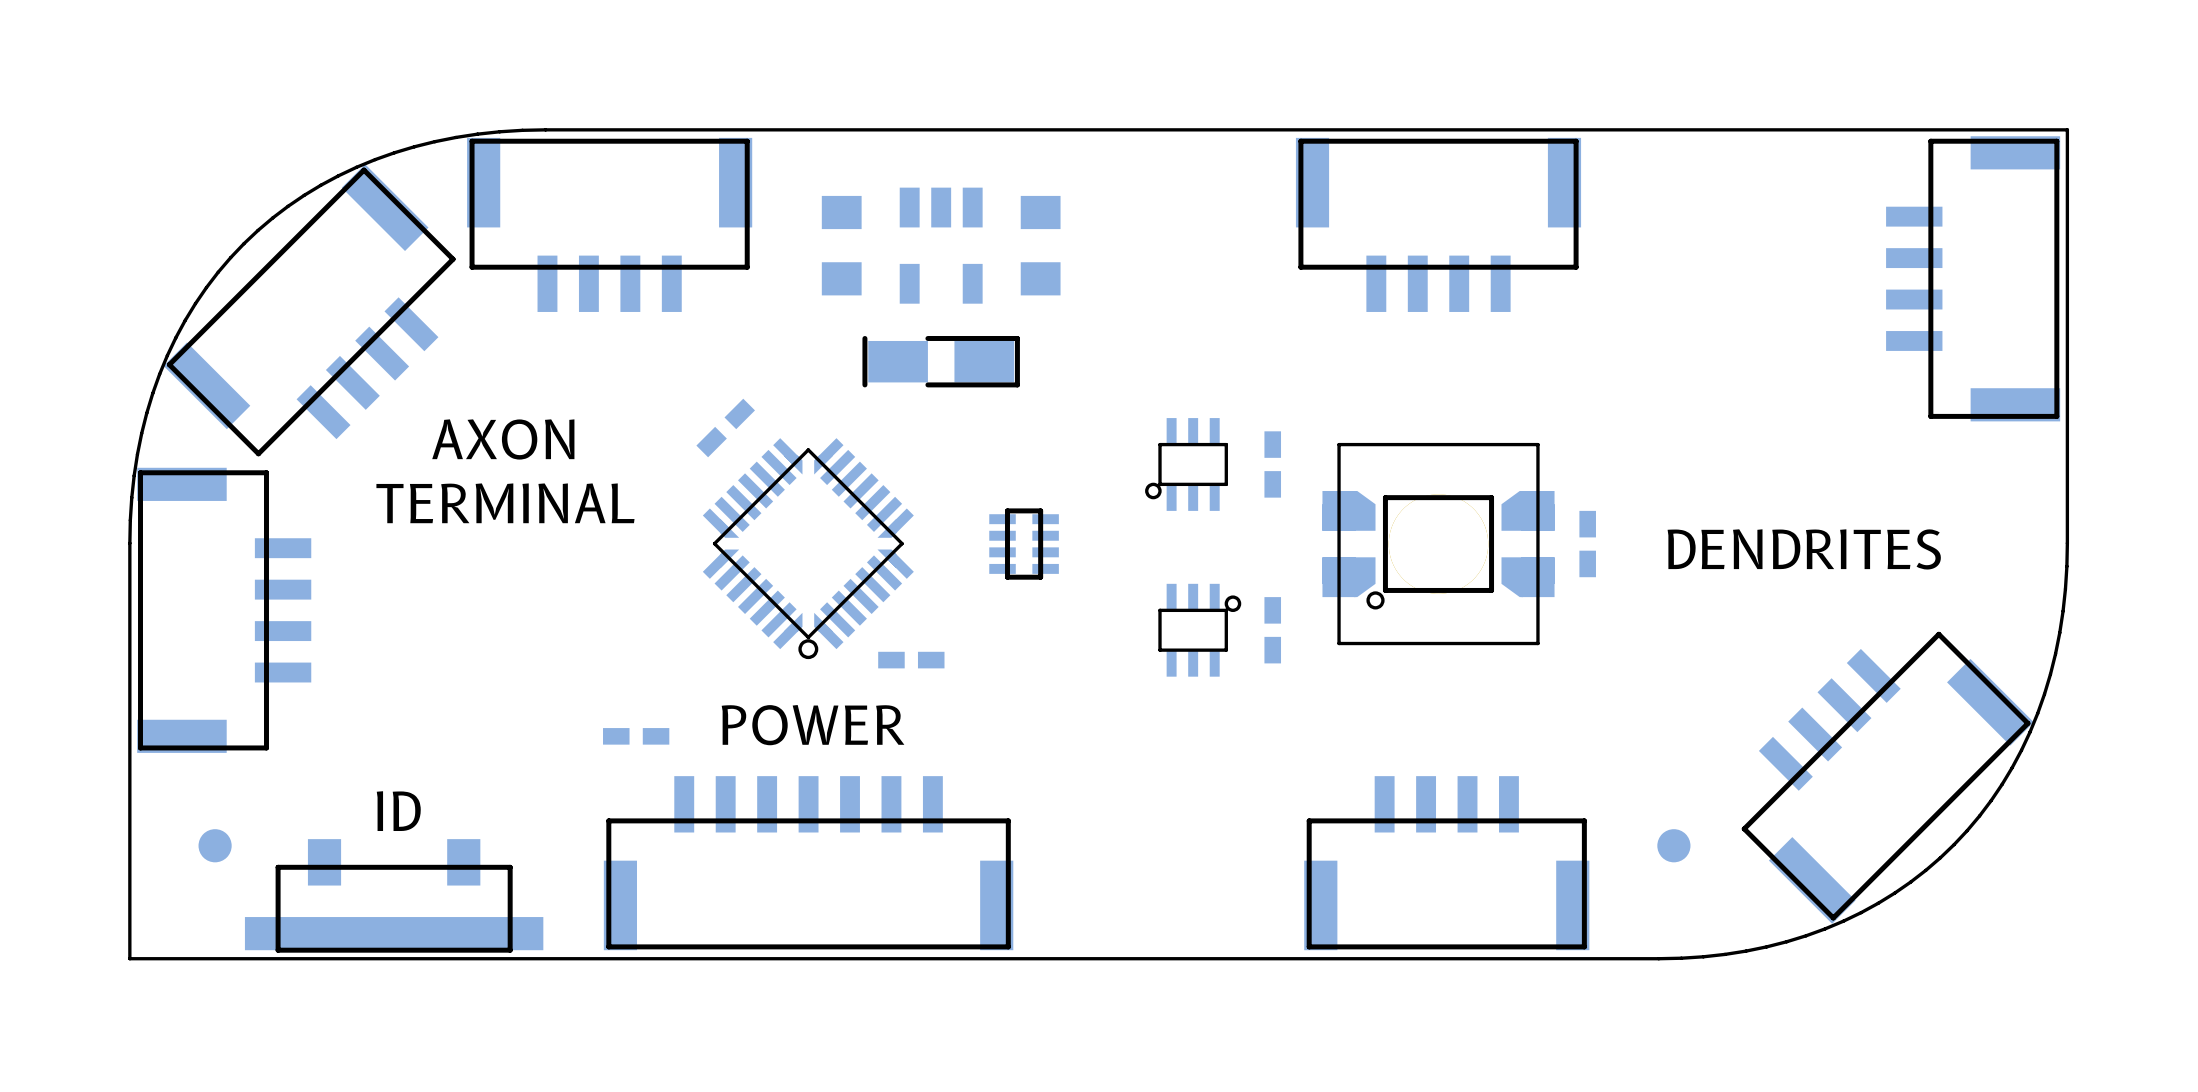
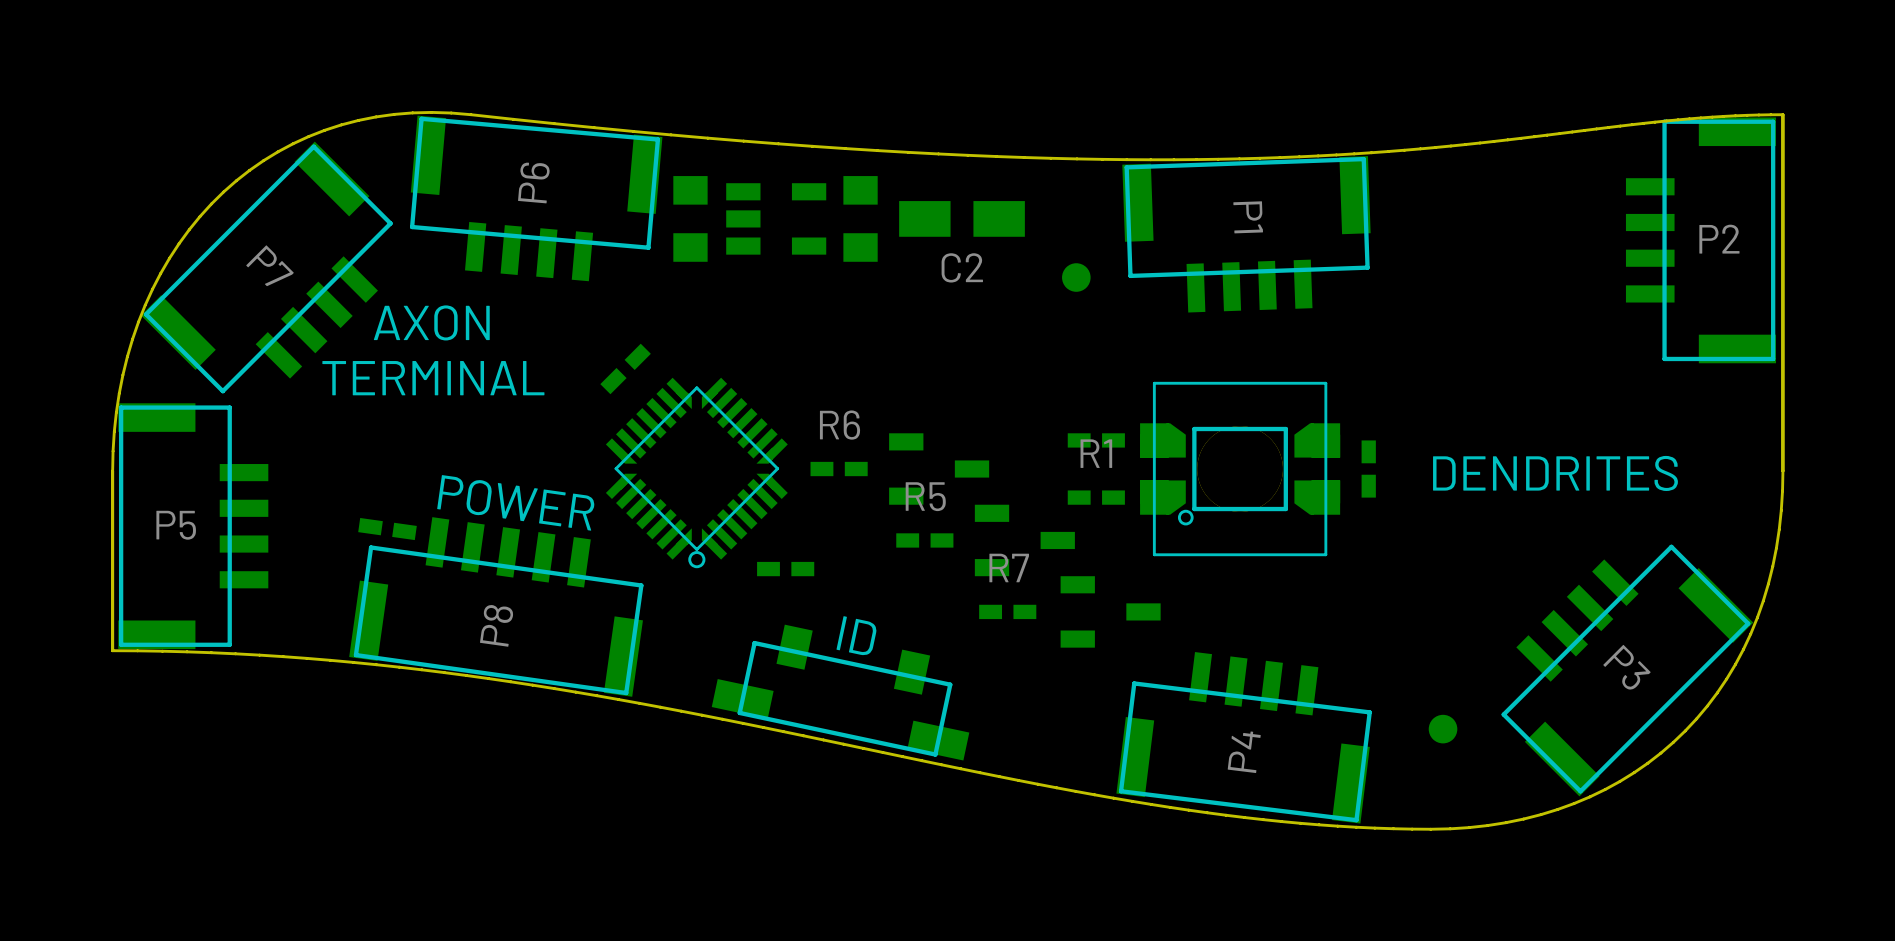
board edge: (2067, 129) (522, 130) (477, 134) (434, 141) (394, 152) (356, 167) (320, 185) (288, 206) (257, 230) (218, 272) (195, 303) (175, 337) (159, 374) (146, 413) (134, 475) (130, 520) (129, 958) (1681, 958) (1725, 954) (1766, 946) (1806, 935) (1843, 921) (1878, 903) (1910, 882) (1954, 844) (1979, 815) (2002, 784) (2021, 750) (2037, 713) (2050, 674) (2063, 611) (2066, 566) (2067, 129) -> (431, 112) (707, 138) (845, 148) (996, 156) (1150, 159) (1259, 158) (1371, 152) (1480, 143) (1677, 119) (1782, 114) (1782, 491) (1776, 548) (1768, 584) (1757, 617) (1735, 664) (1707, 706) (1673, 742) (1634, 772) (1589, 796) (1540, 814) (1487, 825) (1430, 829) (1300, 823) (1151, 804) (1018, 780) (660, 707) (466, 675) (376, 664) (283, 656) (112, 650) (112, 471) (116, 412) (122, 374) (132, 339) (145, 305) (169, 258) (200, 216) (223, 191) (249, 170) (277, 151) (324, 130) (358, 120) (394, 114) (431, 112)
part: (609, 224) -> none
part: (1438, 224) -> none
P6: none -> (536, 198)
part position: (841, 245) -> (690, 218)
part rotation: 0° (941, 245) -> 90° counterclockwise (776, 218)
part position: (1040, 245) -> (860, 218)
C2: none -> (962, 218)
P1: none -> (1246, 234)
P2 name: none -> P2 (1719, 239)
P7 name: none -> P7 (270, 265)
part: none -> (1076, 277)
part: (941, 361) -> none
text: none -> AXON (431, 322)
text: AXON (503, 439) -> TERMINAL (433, 378)
part: (1186, 464) -> none
part rotation: 0° (1272, 464) -> 90° clockwise (1096, 440)
part position: (1272, 464) -> (1096, 440)
text: TERMINAL (505, 503) -> none
R6: none -> (839, 469)
part: (1024, 544) -> none
part: none -> (939, 469)
R1: none -> (1096, 497)
part footprint: [1158, 583, 1242, 677] -> [974, 504, 1075, 577]
P5 name: none -> P5 (176, 525)
part: none -> (387, 529)
R5: none -> (924, 540)
part: (1272, 630) -> none
P8: none -> (496, 606)
R7: none -> (1007, 611)
part: none -> (1110, 611)
text rotation: 0° (813, 725) -> 8° clockwise (515, 502)
text position: POWER (813, 725) -> POWER (515, 502)
part: (636, 736) -> none
P3 name: none -> P3 (1626, 667)
part: none -> (840, 692)
text rotation: 0° (398, 811) -> 12° clockwise (856, 635)
text position: ID (398, 811) -> ID (856, 635)
part: (215, 845) -> none
P4: none -> (1244, 737)
part: (808, 863) -> none
part: (1446, 863) -> none
part: (394, 895) -> none

